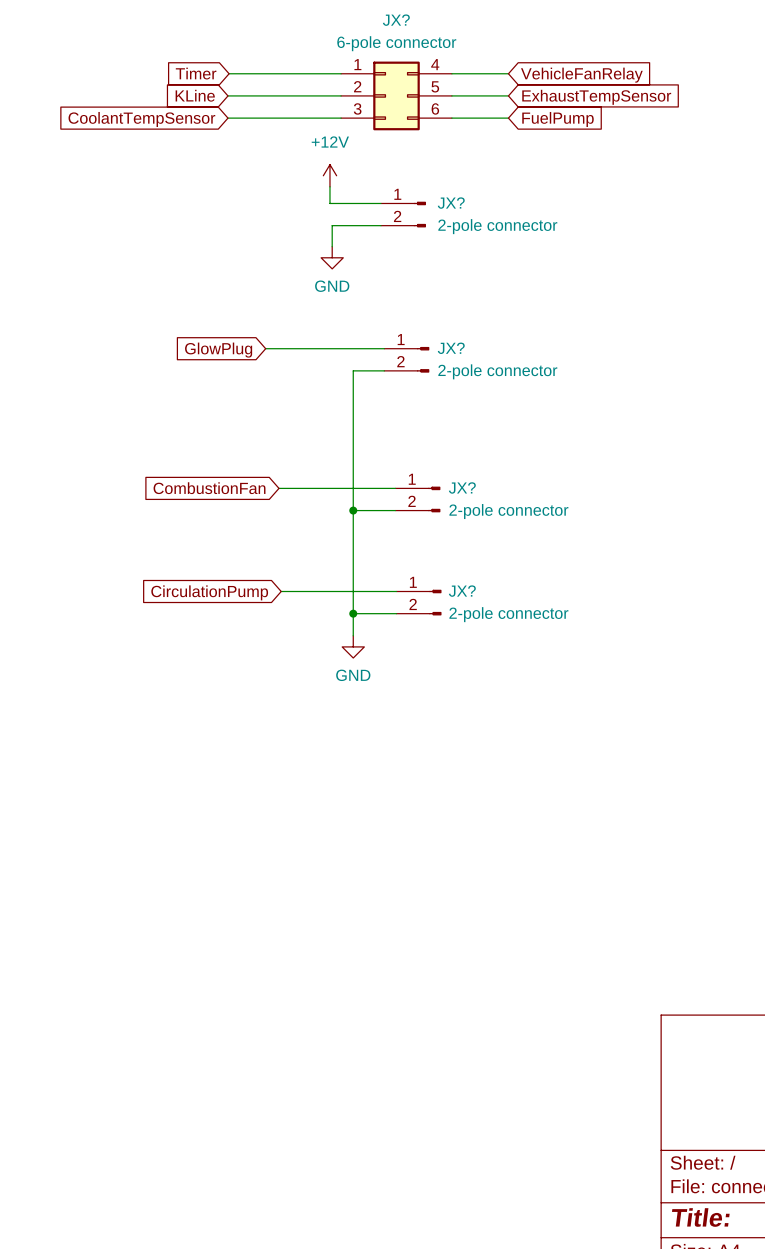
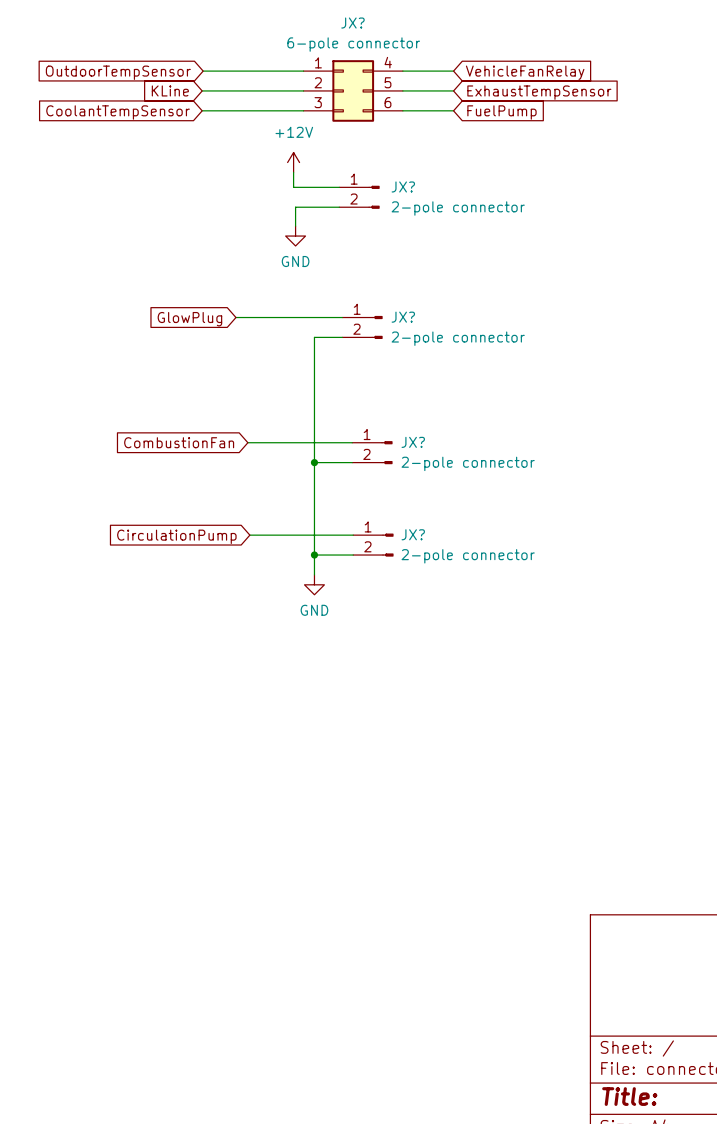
global label: Timer (196, 73) -> OutdoorTempSensor (118, 72)

